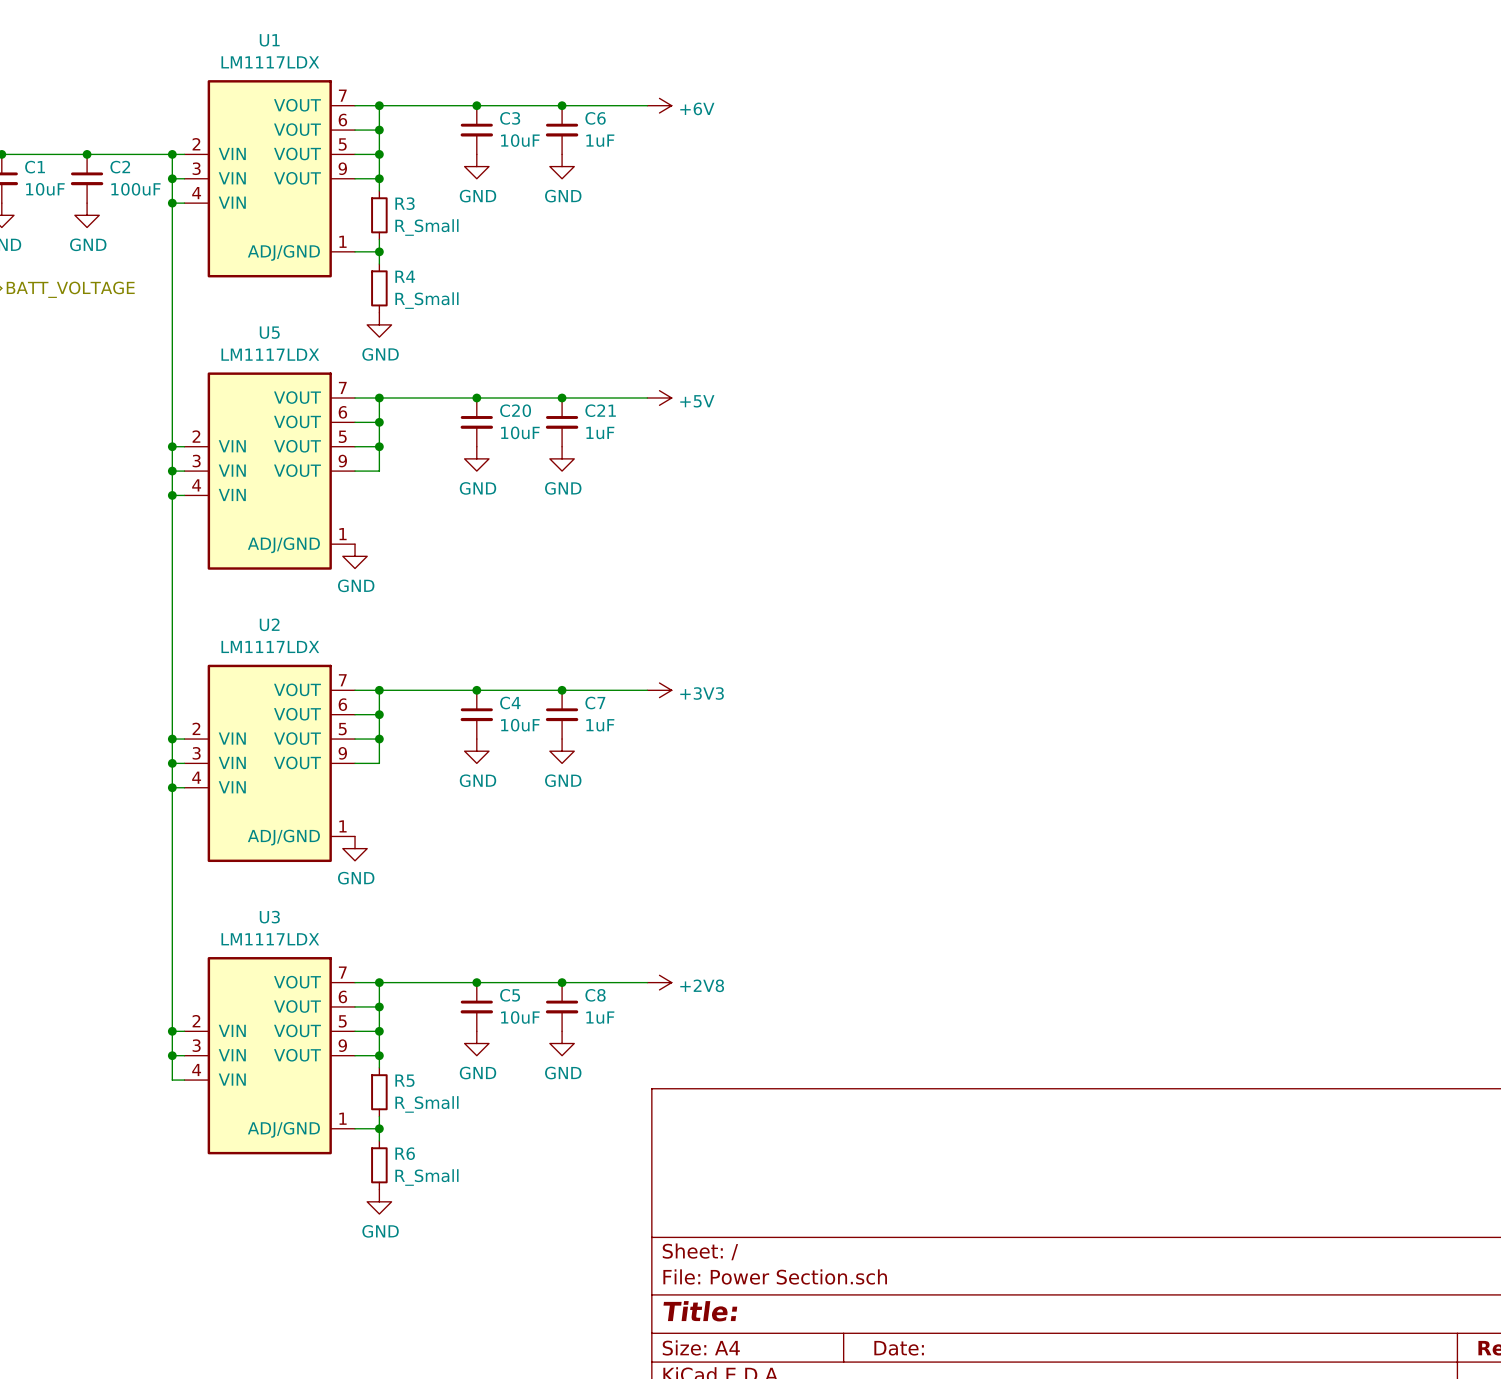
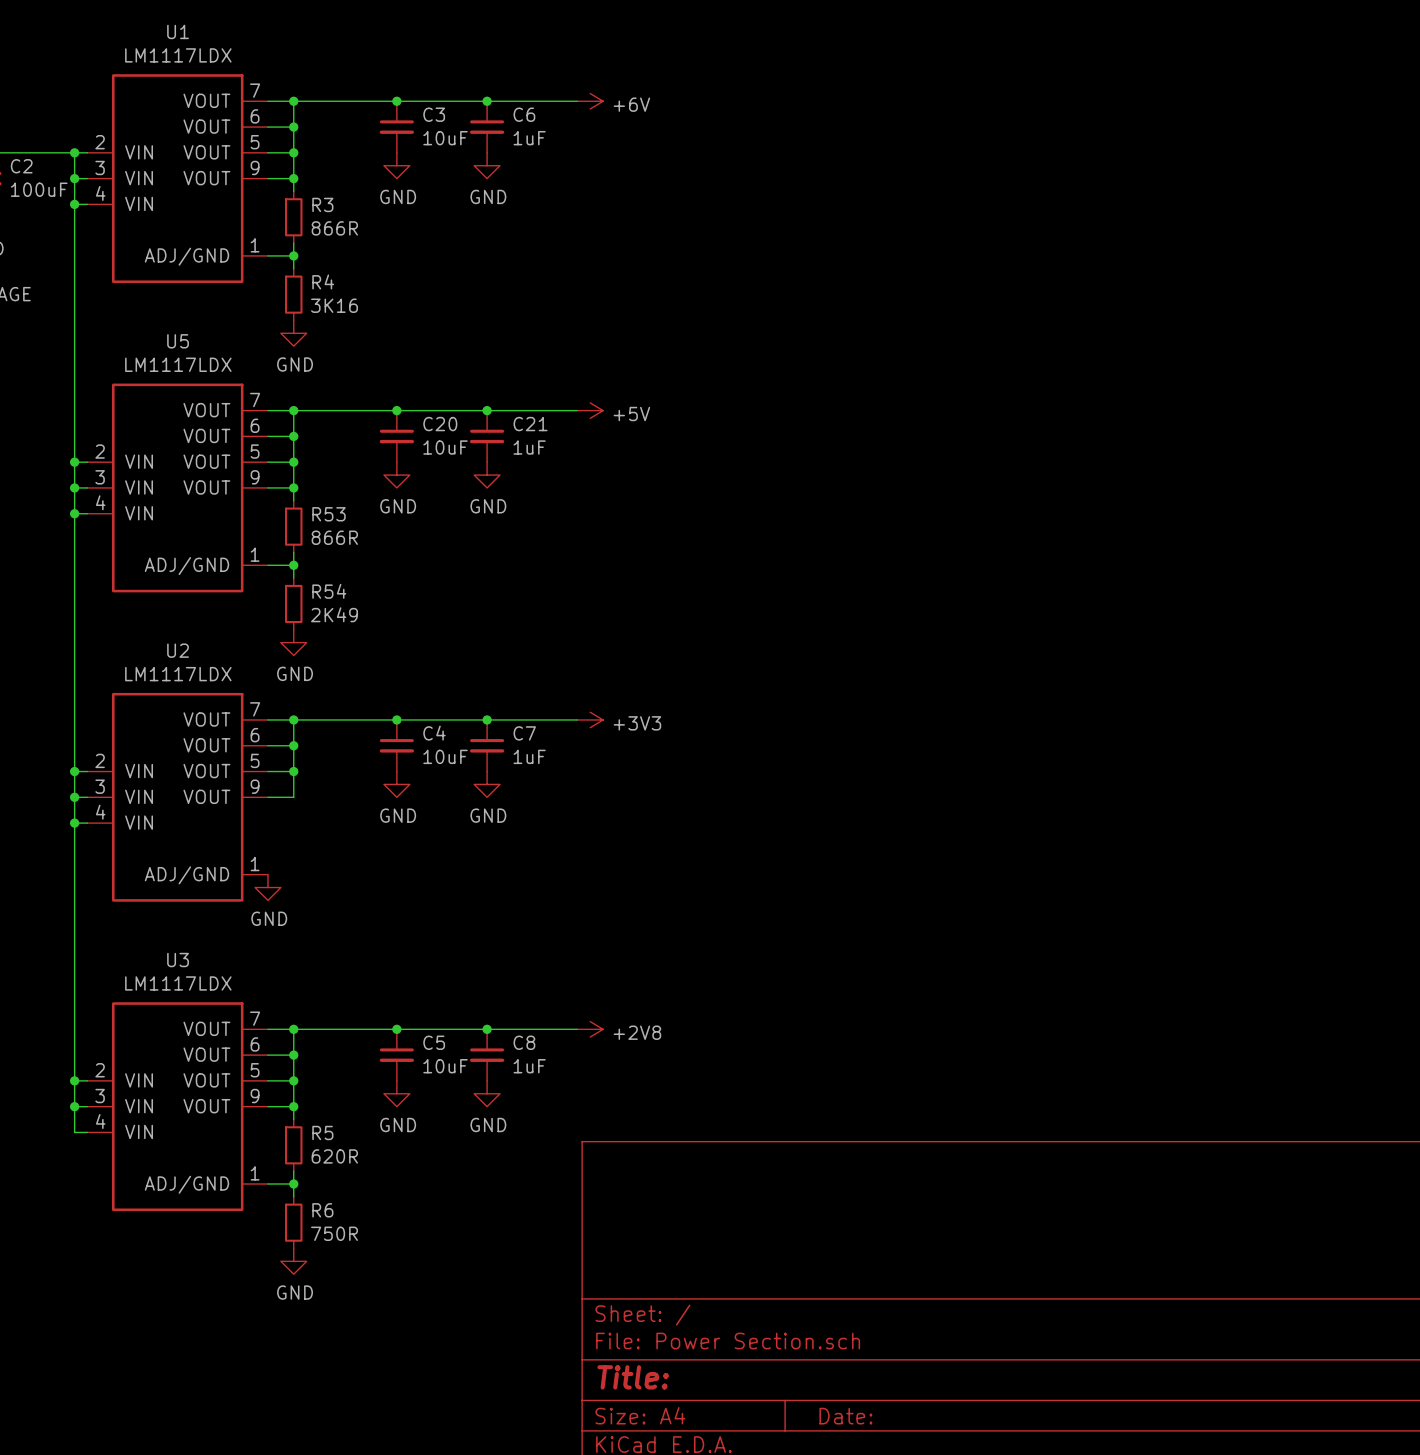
R3 value: R_Small (426, 227) -> 866R (334, 228)
R4 value: R_Small (426, 300) -> 3K16 (334, 305)
wire: none -> (293, 487) (293, 500)
junction: none -> (293, 487)
R53: none -> 866R (293, 526)
wire: none -> (293, 552) (293, 578)
wire: none -> (267, 565) (293, 565)
junction: none -> (293, 565)
power symbol position: GND (355, 556) -> GND (293, 642)
R54: none -> 2K49 (293, 603)
R5 value: R_Small (426, 1104) -> 620R (334, 1156)
R6 value: R_Small (426, 1177) -> 750R (334, 1233)

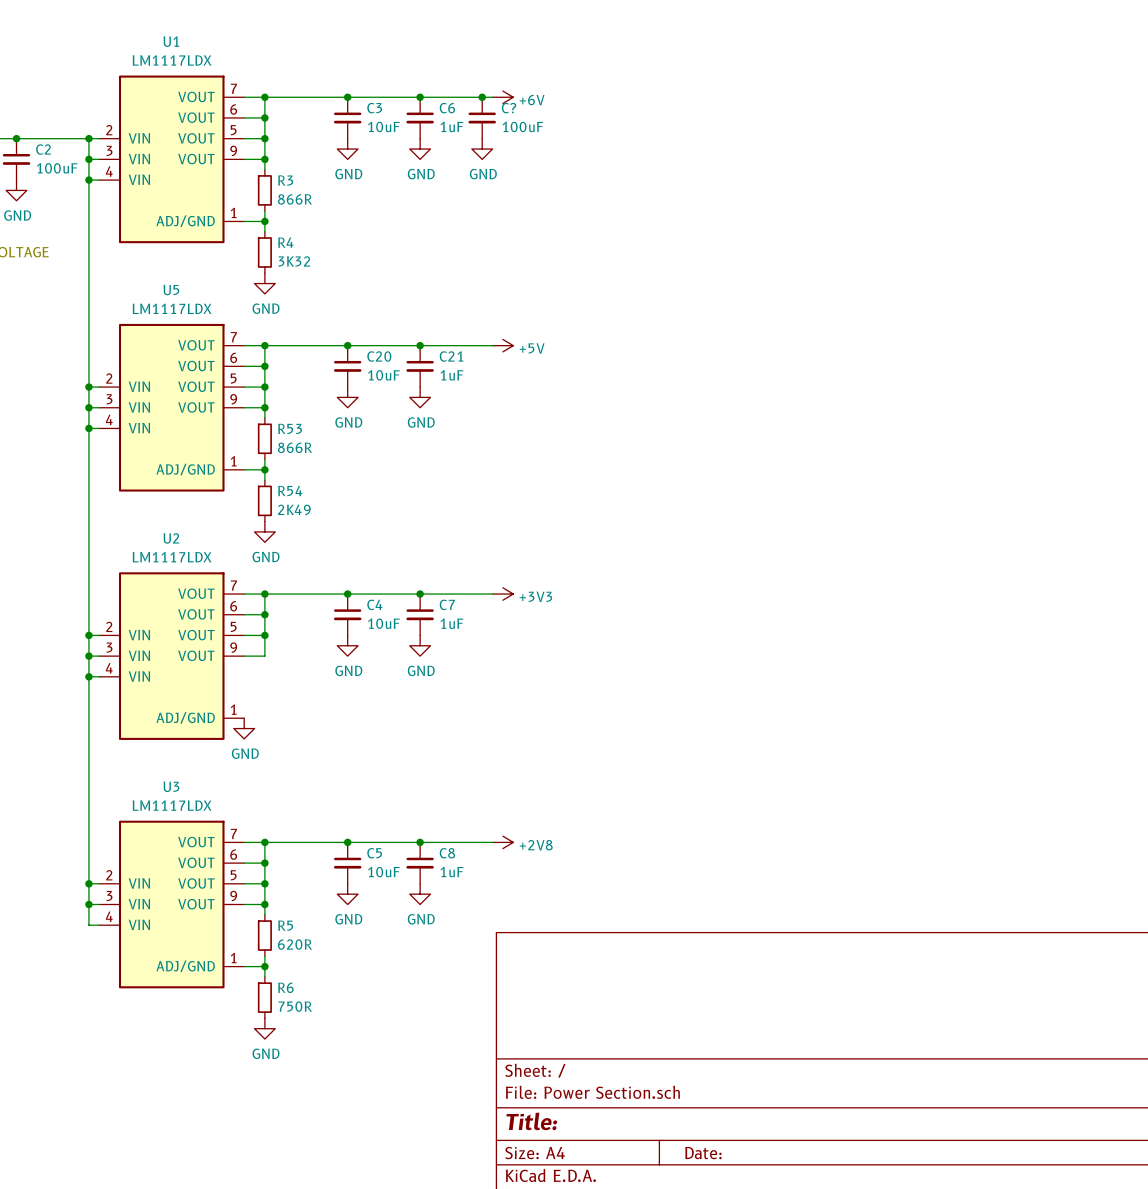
junction: none -> (482, 97)
C?: none -> 100uF (482, 117)
power symbol: none -> GND (482, 149)
R4 value: 3K16 (334, 305) -> 3K32 (294, 261)

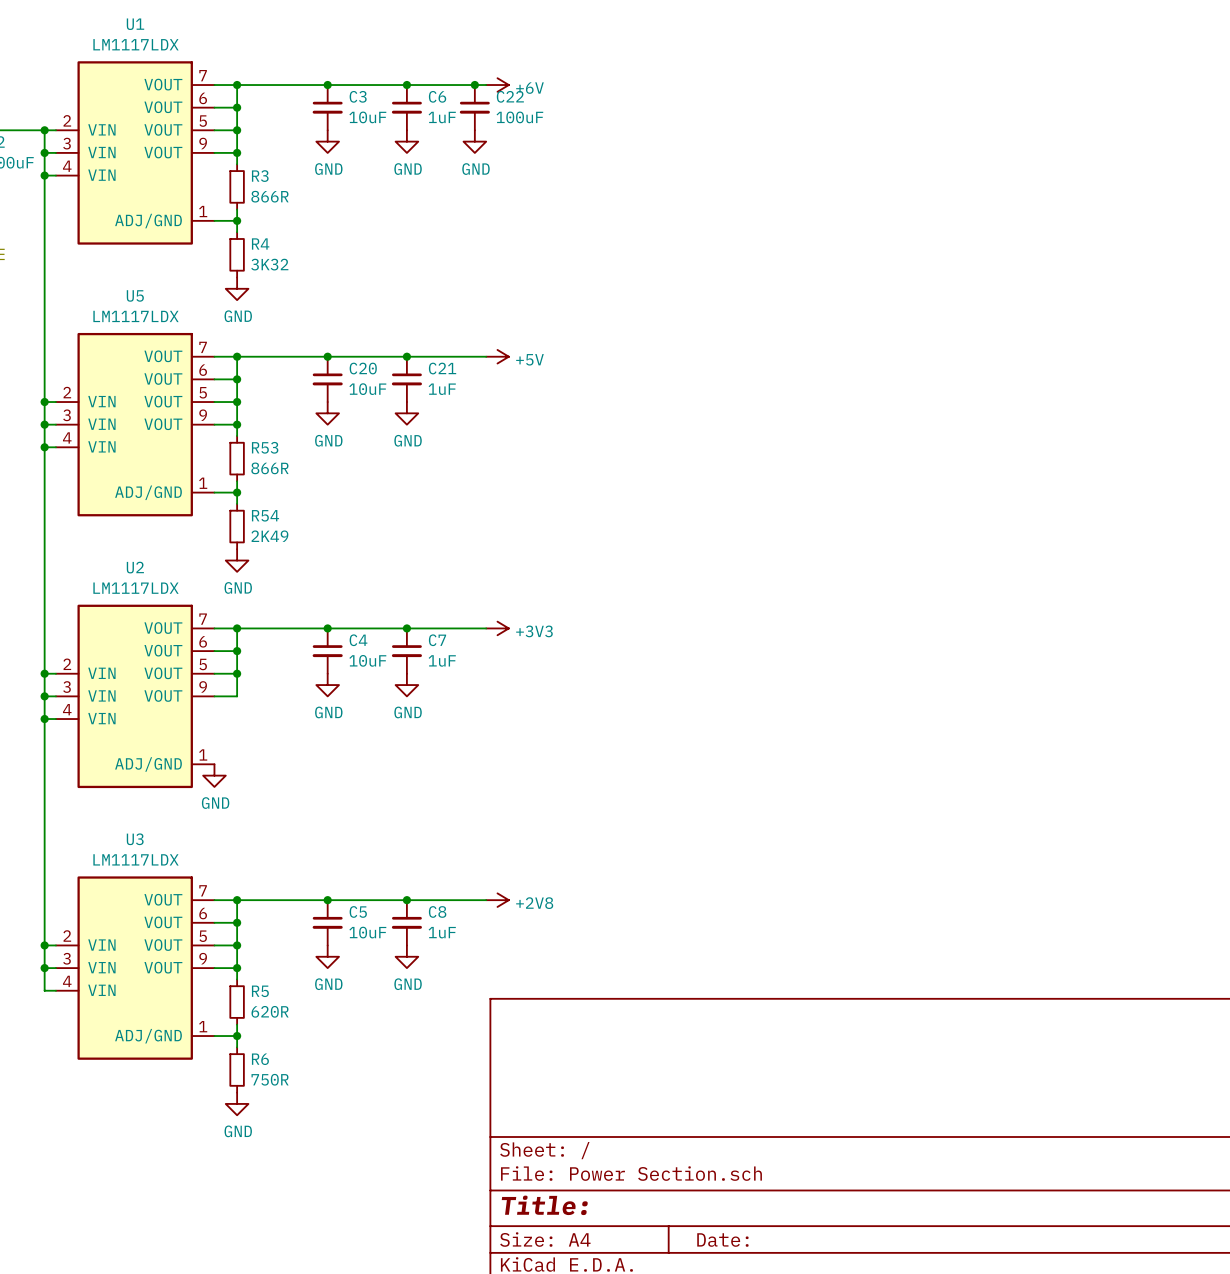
C? name: C? (509, 108) -> C22 (510, 96)

